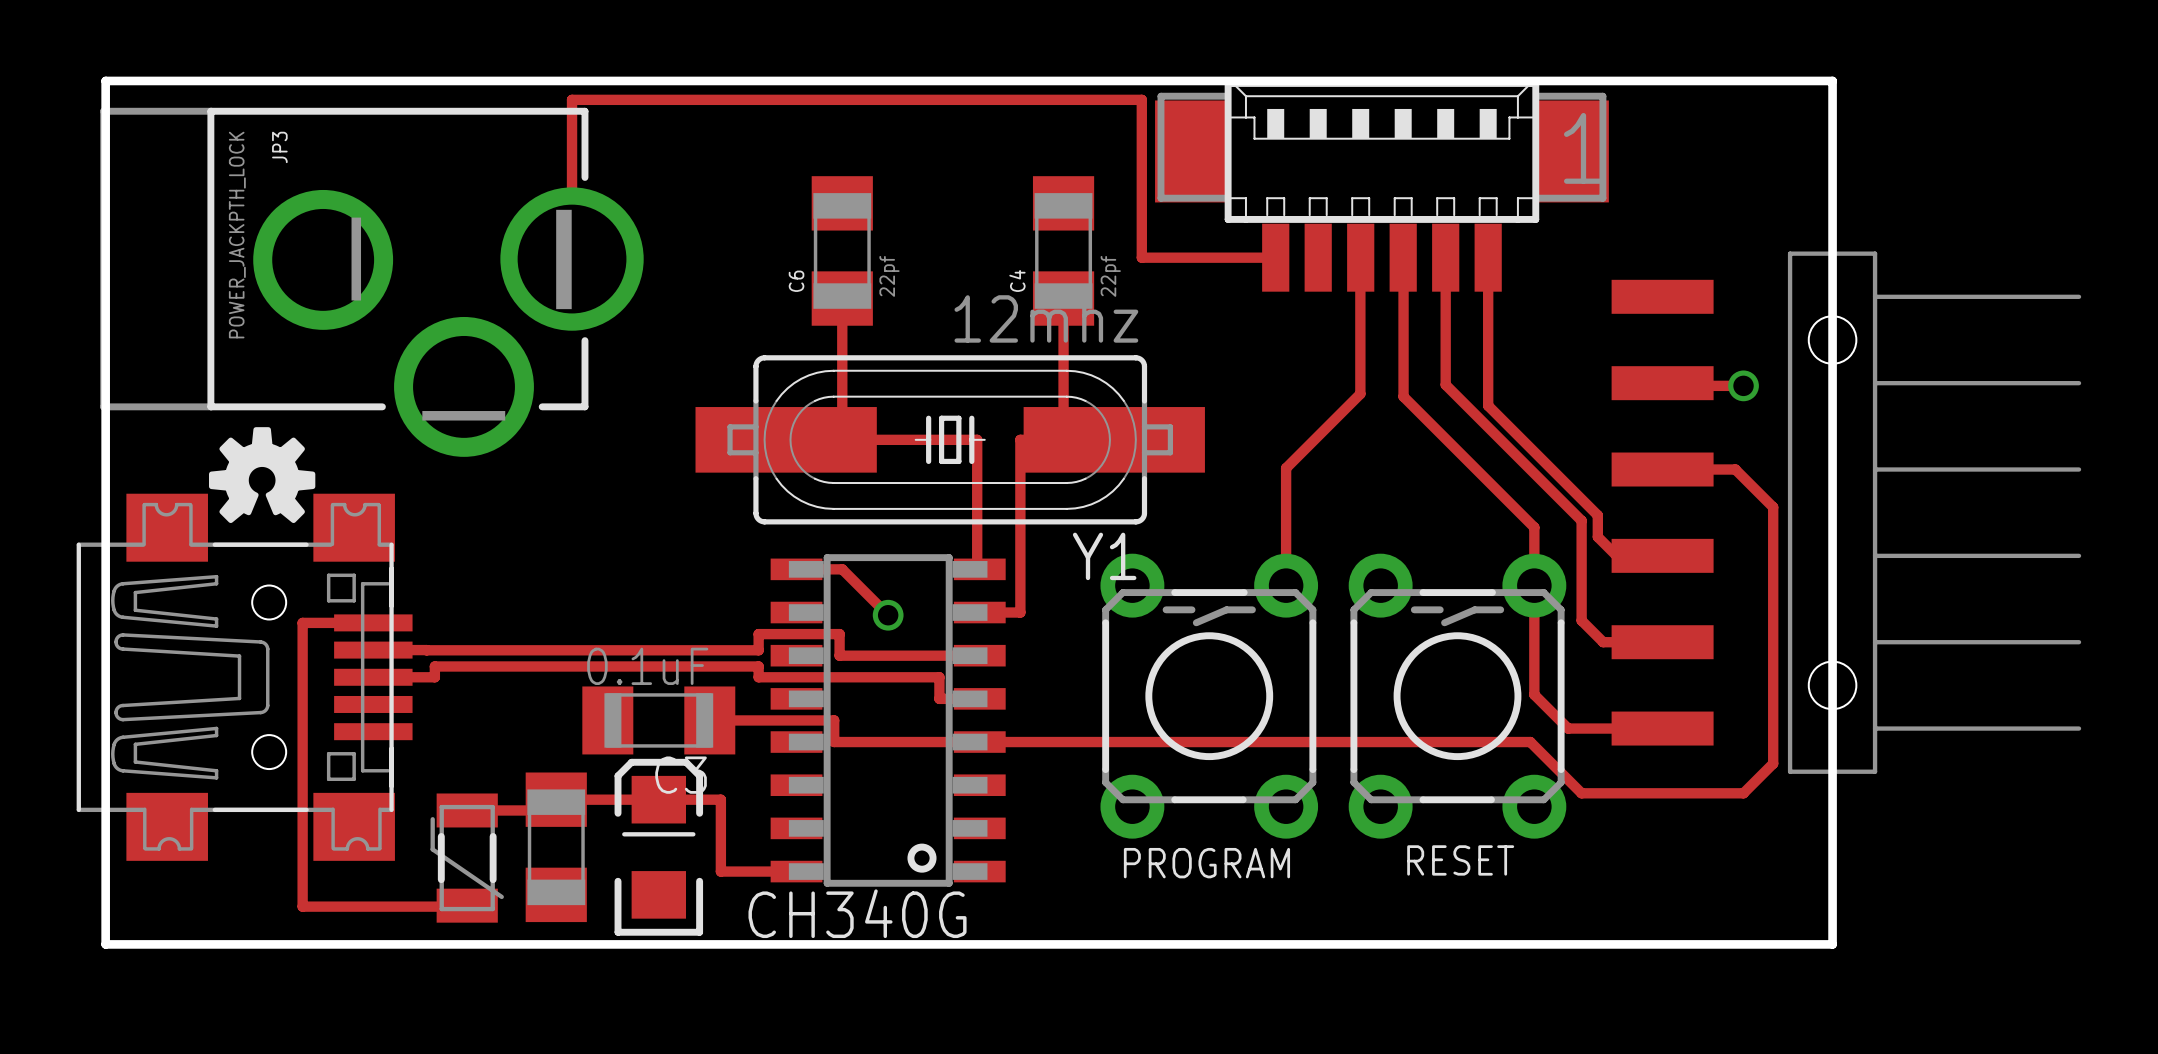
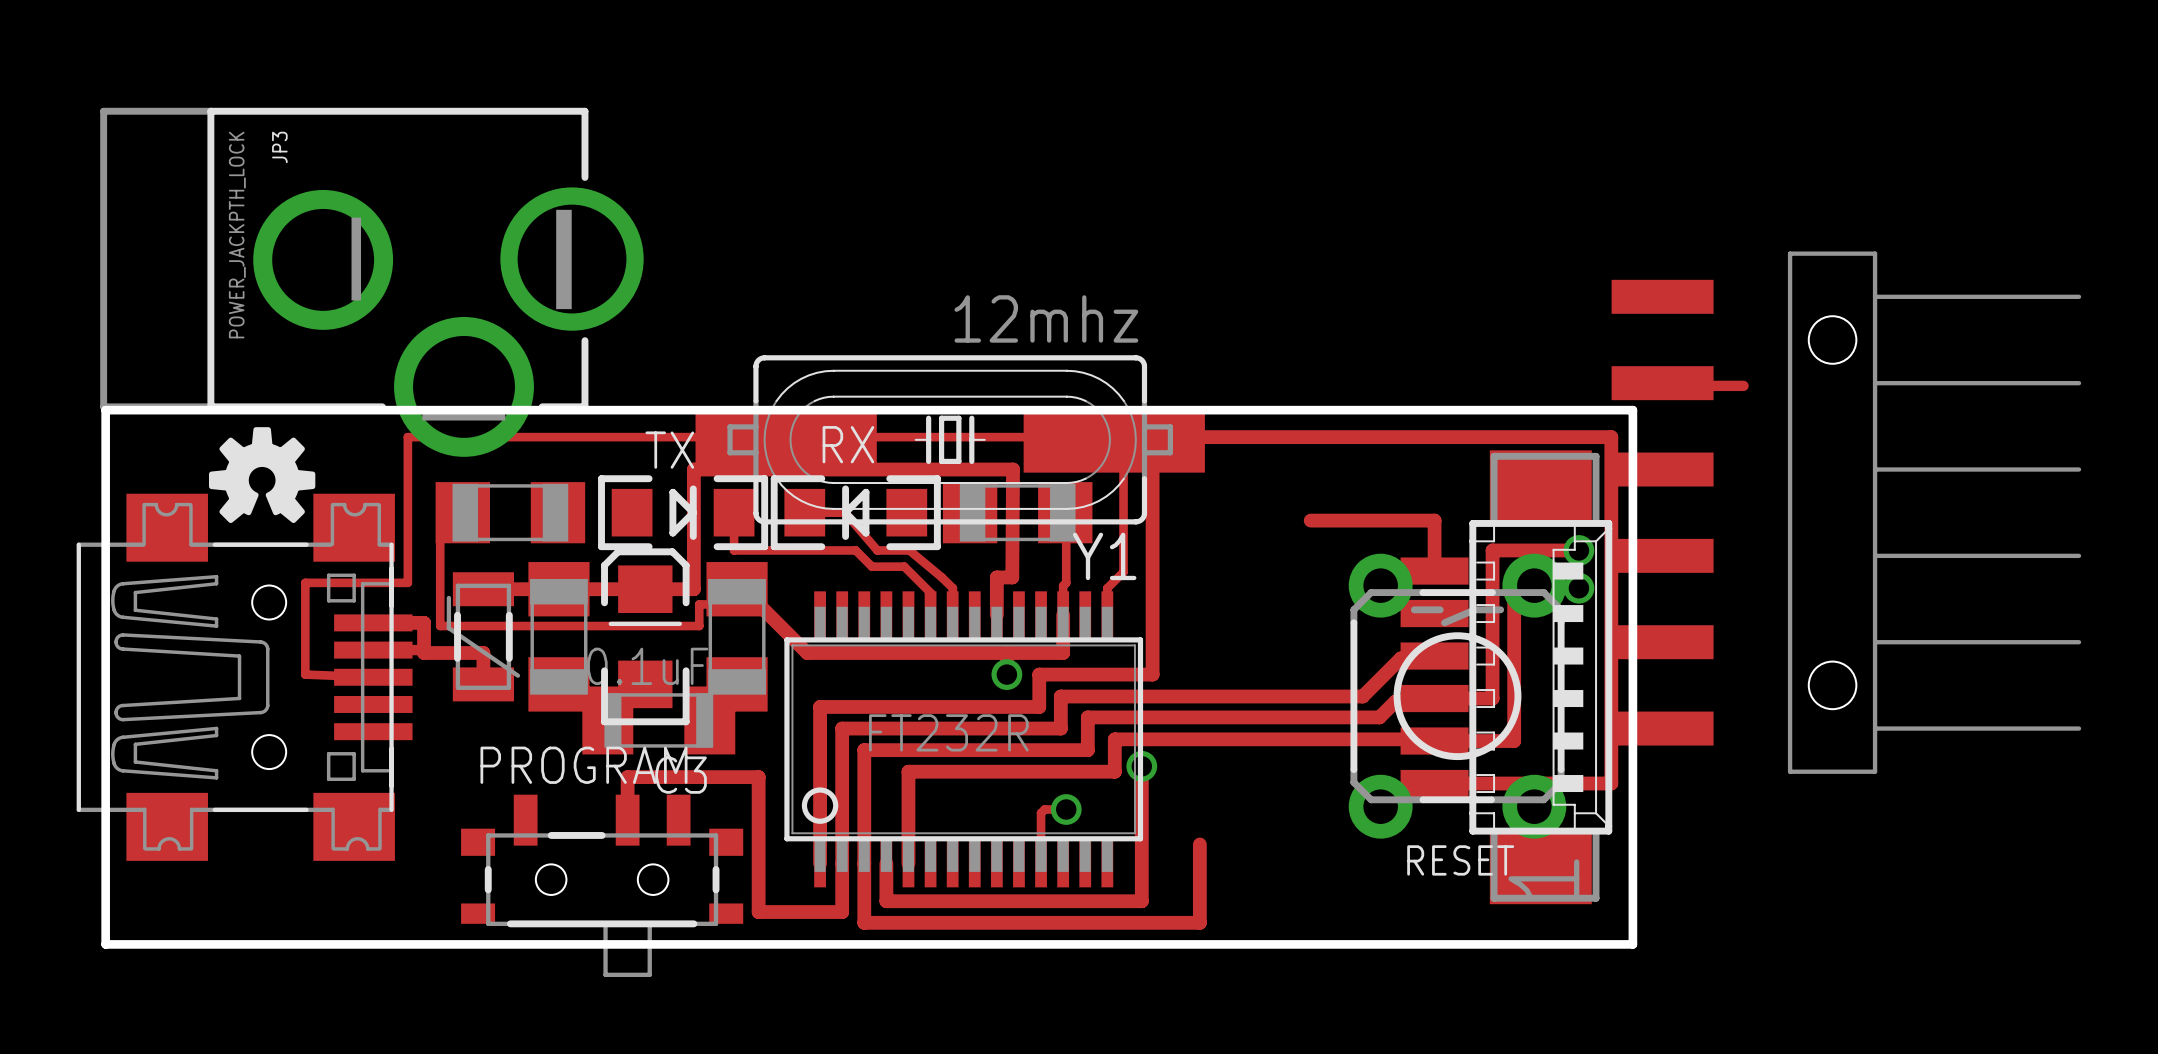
part: (1381, 185) -> none
C6: 22pf (842, 250) -> none
C4: 22pf (1063, 250) -> none
track: (1275, 257) (1141, 257) (1141, 99) (572, 99) (572, 259) -> none
track: (1445, 257) (1445, 384) (1581, 520) (1581, 620) (1603, 642) (1662, 642) -> none
track: (1488, 257) (1488, 405) (1597, 515) (1597, 536) (1616, 555) (1662, 555) -> none
track: (1360, 258) (1360, 393) (1286, 468) (1286, 585) -> none
track: (1403, 258) (1403, 396) (1534, 527) (1534, 694) (1568, 728) (1662, 728) -> none
track: (842, 298) (842, 439) -> none
track: (1063, 298) (1063, 439) -> none
via: (1743, 385) -> none
board edge: (105, 410) (105, 80) (1832, 80) (1832, 944) (1632, 944) -> (105, 410) (1632, 410) (1632, 944)
track: (786, 439) (977, 439) (977, 569) (979, 569) -> none
track: (1114, 439) (1020, 439) (1020, 612) (979, 612) -> none
track: (1662, 469) (1735, 469) (1773, 507) (1773, 763) (1743, 793) (1581, 793) (1530, 742) (834, 742) (834, 720) (709, 720) -> none
track: none -> (462, 512) (440, 512) (440, 626) (699, 626) (699, 604) (737, 604) (737, 589)
part: none -> (510, 512)
TX: none -> (683, 512)
track: none -> (734, 512) (734, 550) (855, 550) (871, 566) (904, 566) (931, 593) (930, 615)
track: none -> (804, 512) (844, 512) (877, 550) (909, 550) (952, 588) (952, 615)
RX: none -> (855, 512)
part: none -> (1017, 512)
track: none -> (1065, 512) (1060, 512) (1066, 518) (1066, 582) (1063, 585) (1063, 653) (807, 653) (743, 589) (737, 589)
track: none -> (1310, 520) (1434, 520) (1434, 571)
track: none -> (1578, 550) (1492, 550) (1492, 698) (1434, 698) (1431, 701) (1395, 701) (1379, 717) (1087, 717) (1087, 750) (864, 750) (864, 922) (1199, 922) (1199, 844)
via: none -> (1578, 550)
track: (796, 569) (842, 569) (888, 615) -> none
track: none -> (1578, 588) (1514, 588) (1514, 741) (1114, 739) (1114, 771) (908, 771) (908, 863)
via: none -> (1578, 588)
track: none -> (483, 589) (693, 589) (693, 469) (1013, 469) (1012, 577) (996, 577) (996, 615)
via: (888, 615) -> none
track: (373, 622) (302, 622) (302, 906) (467, 905) -> (373, 622) (424, 622) (424, 653) (483, 653) (483, 684)
part: none -> (558, 636)
part: none -> (737, 636)
track: (426, 650) (758, 650) (758, 634) (839, 634) (839, 655) (979, 655) -> none
track: none -> (1434, 656) (1432, 658) (1400, 658) (1362, 696) (1060, 696) (1060, 728) (842, 728) (842, 912) (758, 912) (758, 777) (627, 777) (627, 820)
via: none -> (1006, 674)
track: (373, 677) (434, 677) (434, 666) (758, 666) (758, 677) (939, 677) (939, 698) (979, 698) -> (373, 677) (305, 674) (305, 582) (407, 582) (407, 437) (1123, 437) (1123, 572) (1107, 588) (1107, 615)
part: none -> (1506, 677)
PROGRAM: (1209, 696) -> none
part: (888, 720) -> none
part: none -> FT232R (963, 739)
track: none -> (1141, 766) (1141, 901) (886, 901) (886, 863)
via: none -> (1141, 766)
track: none -> (1434, 783) (1611, 783) (1611, 437) (1152, 437) (1152, 674) (1039, 674) (1039, 706) (820, 706) (820, 863)
track: none -> (1066, 809) (1044, 809) (1041, 813) (1041, 863)
via: none -> (1066, 809)
track: (467, 810) (556, 810) (556, 799) (720, 799) (720, 871) (796, 871) -> none
part: (556, 847) -> none
part position: (658, 847) -> (645, 636)
part position: (467, 858) -> (483, 636)
PROGRAM: none -> (602, 885)

